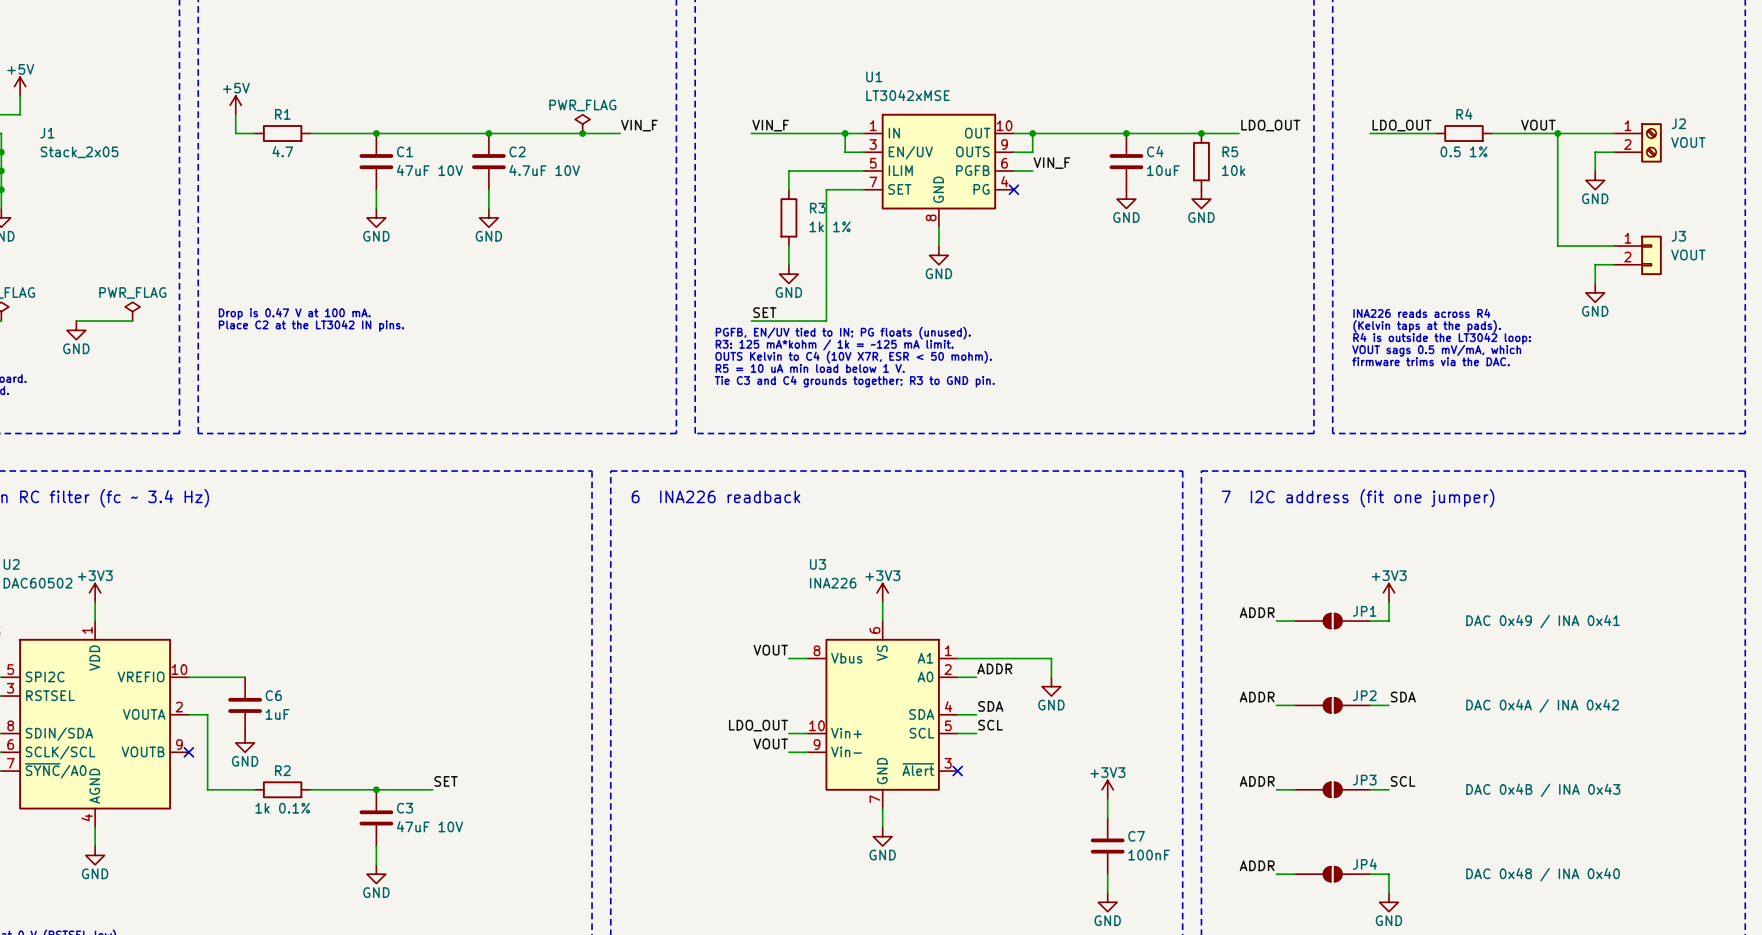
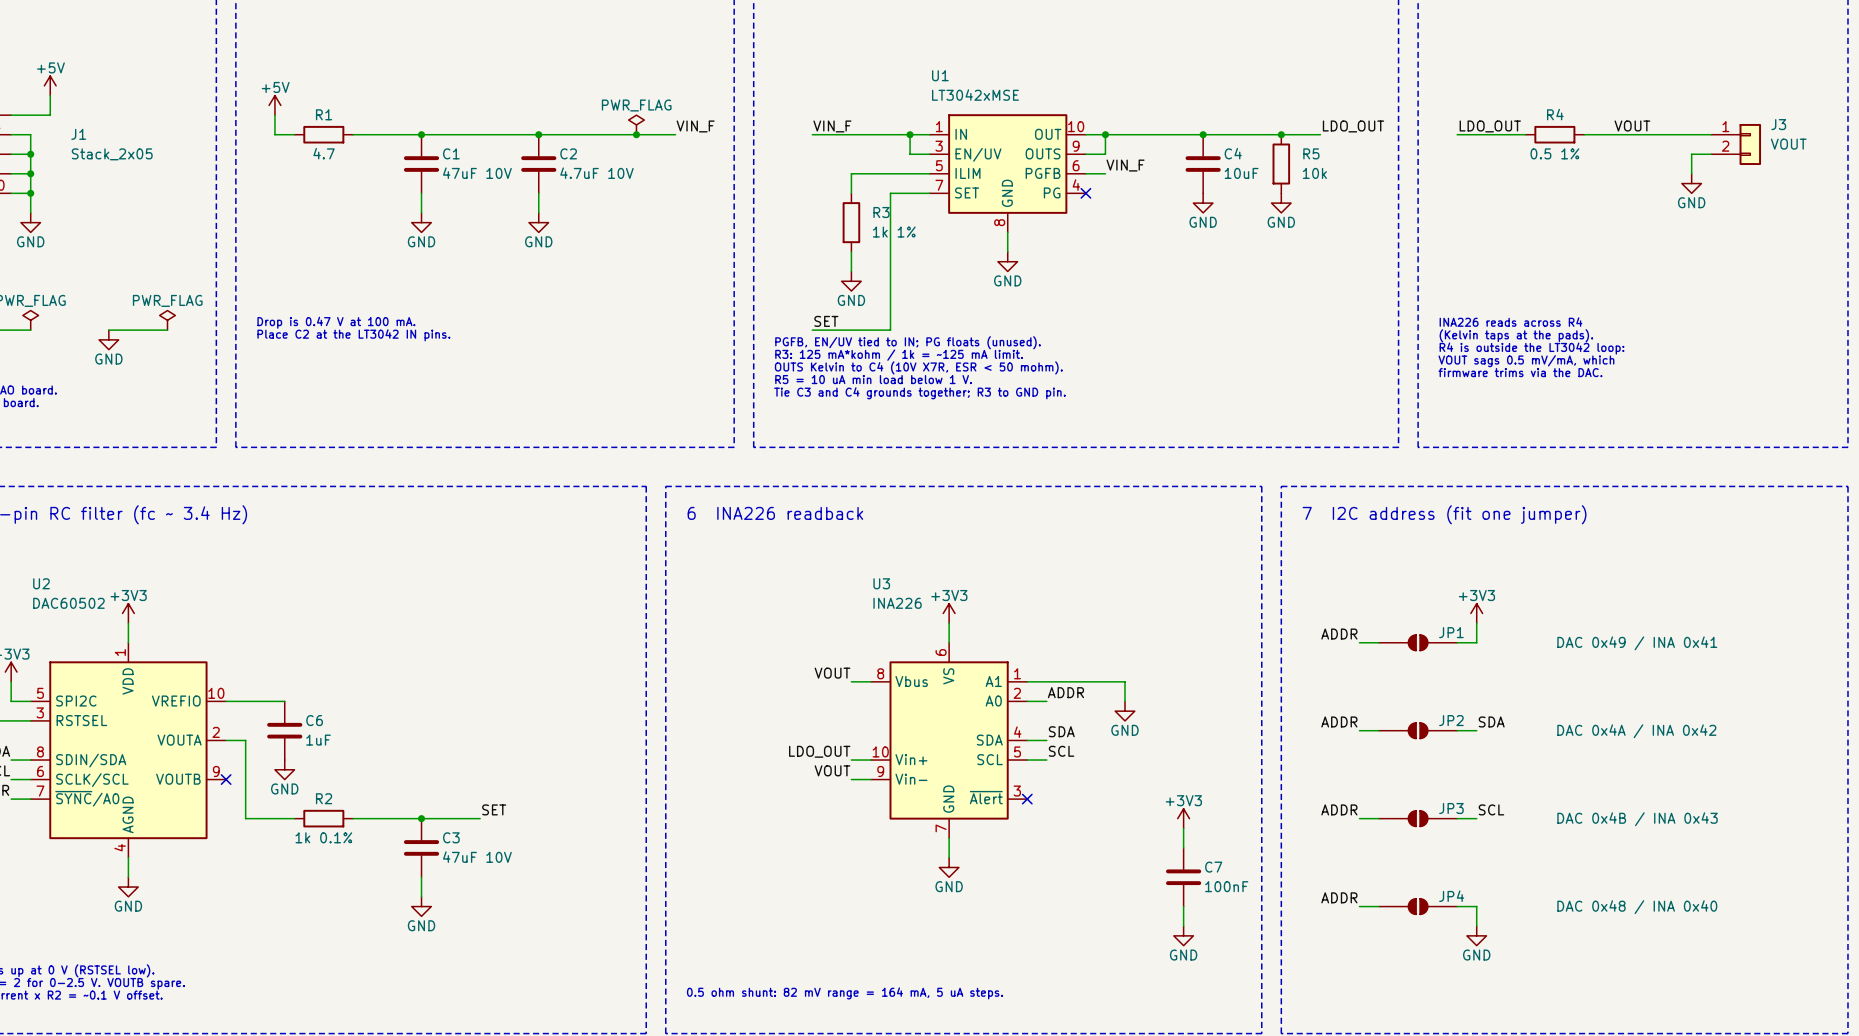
wire: (1557, 133) (1557, 246) (1613, 246) -> none
junction: (1557, 133) -> none
J2: VOUT (1637, 142) -> none
J3 position: (1637, 255) -> (1736, 144)
wire: (1613, 264) (1595, 264) (1595, 283) -> none
power symbol: GND (1595, 292) -> none

